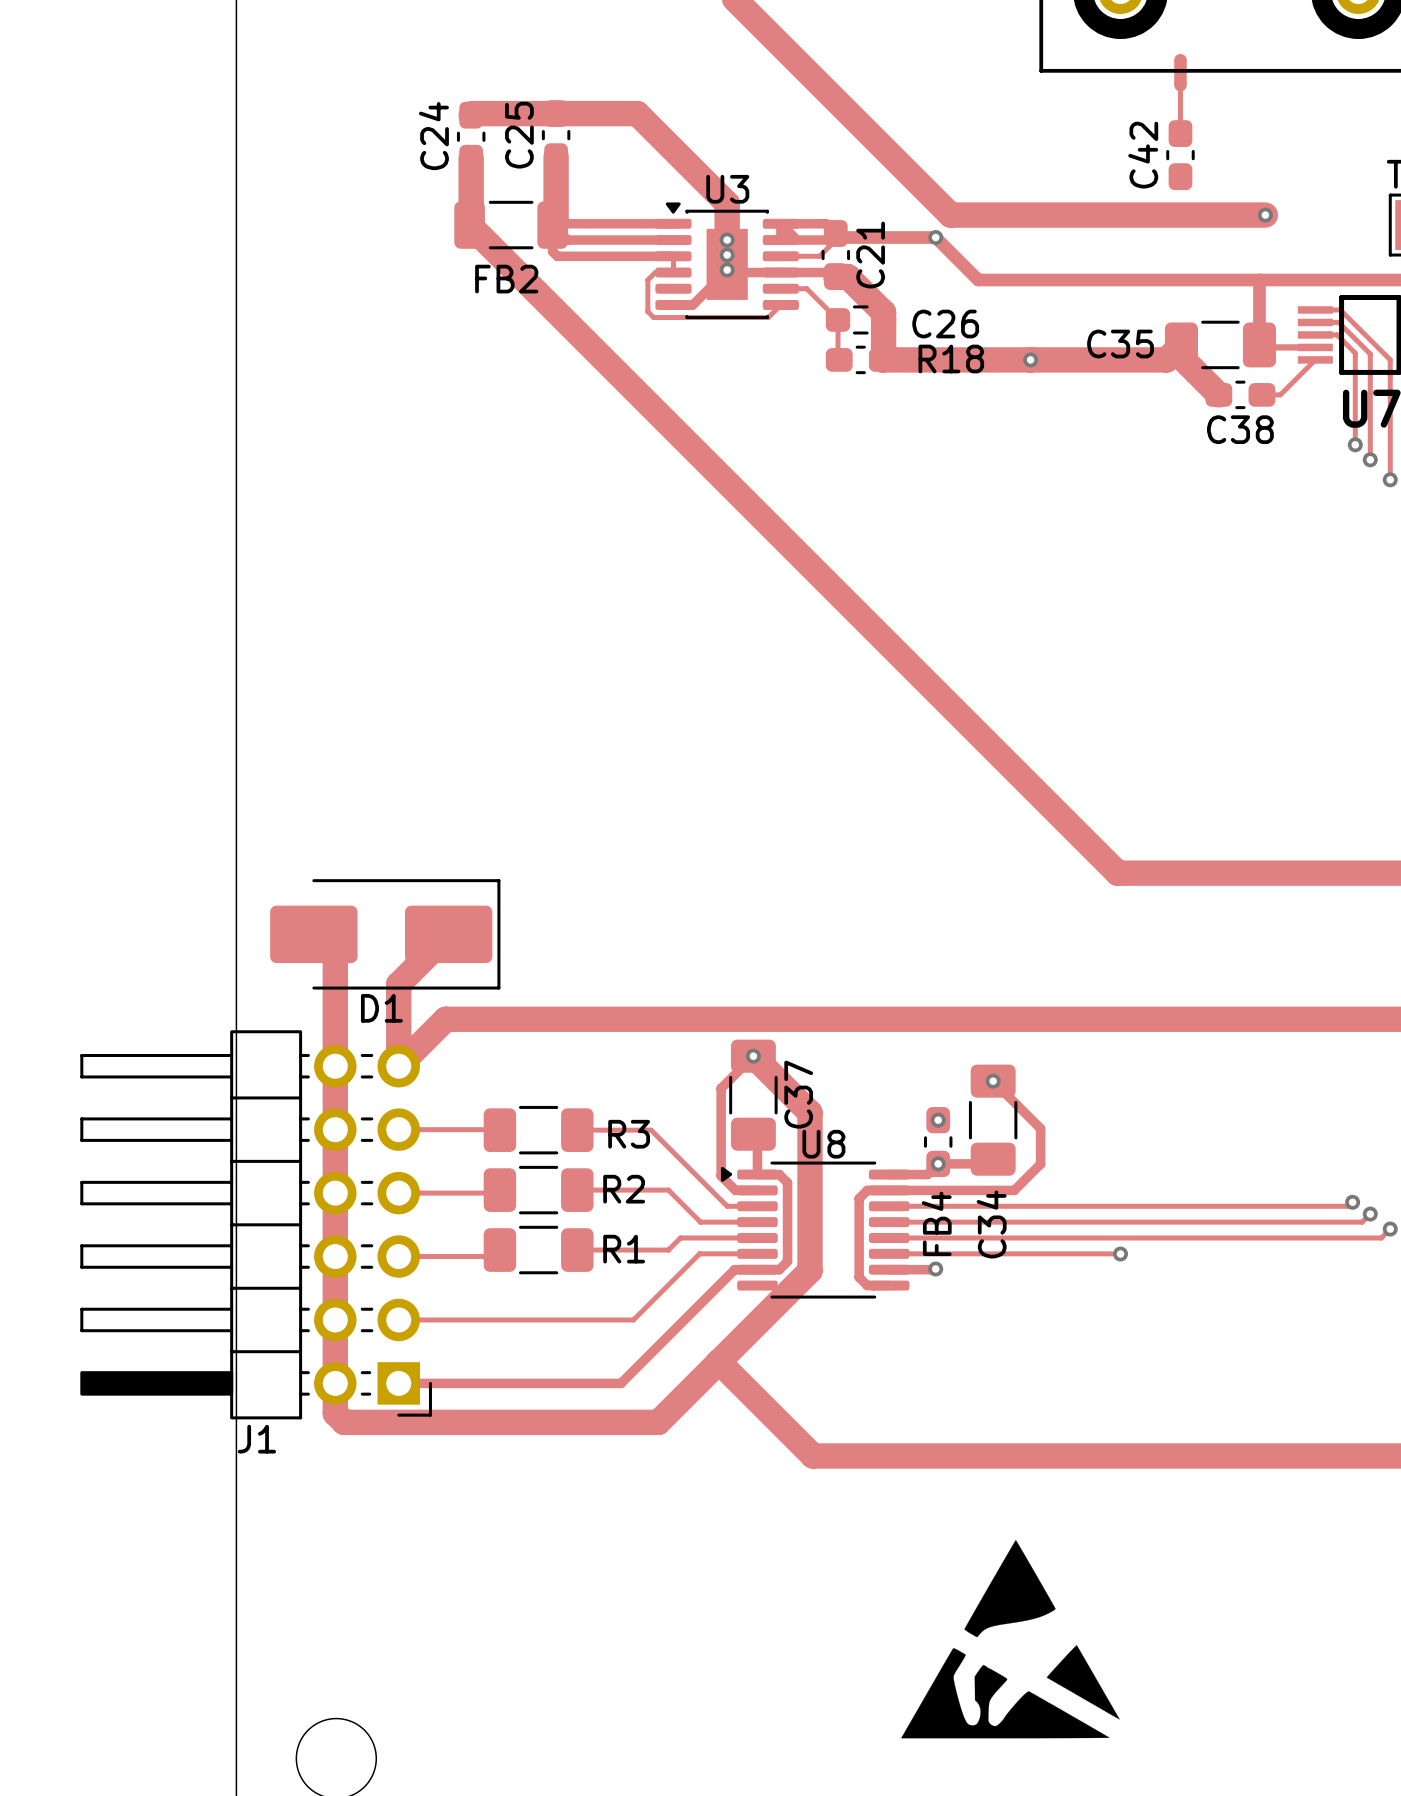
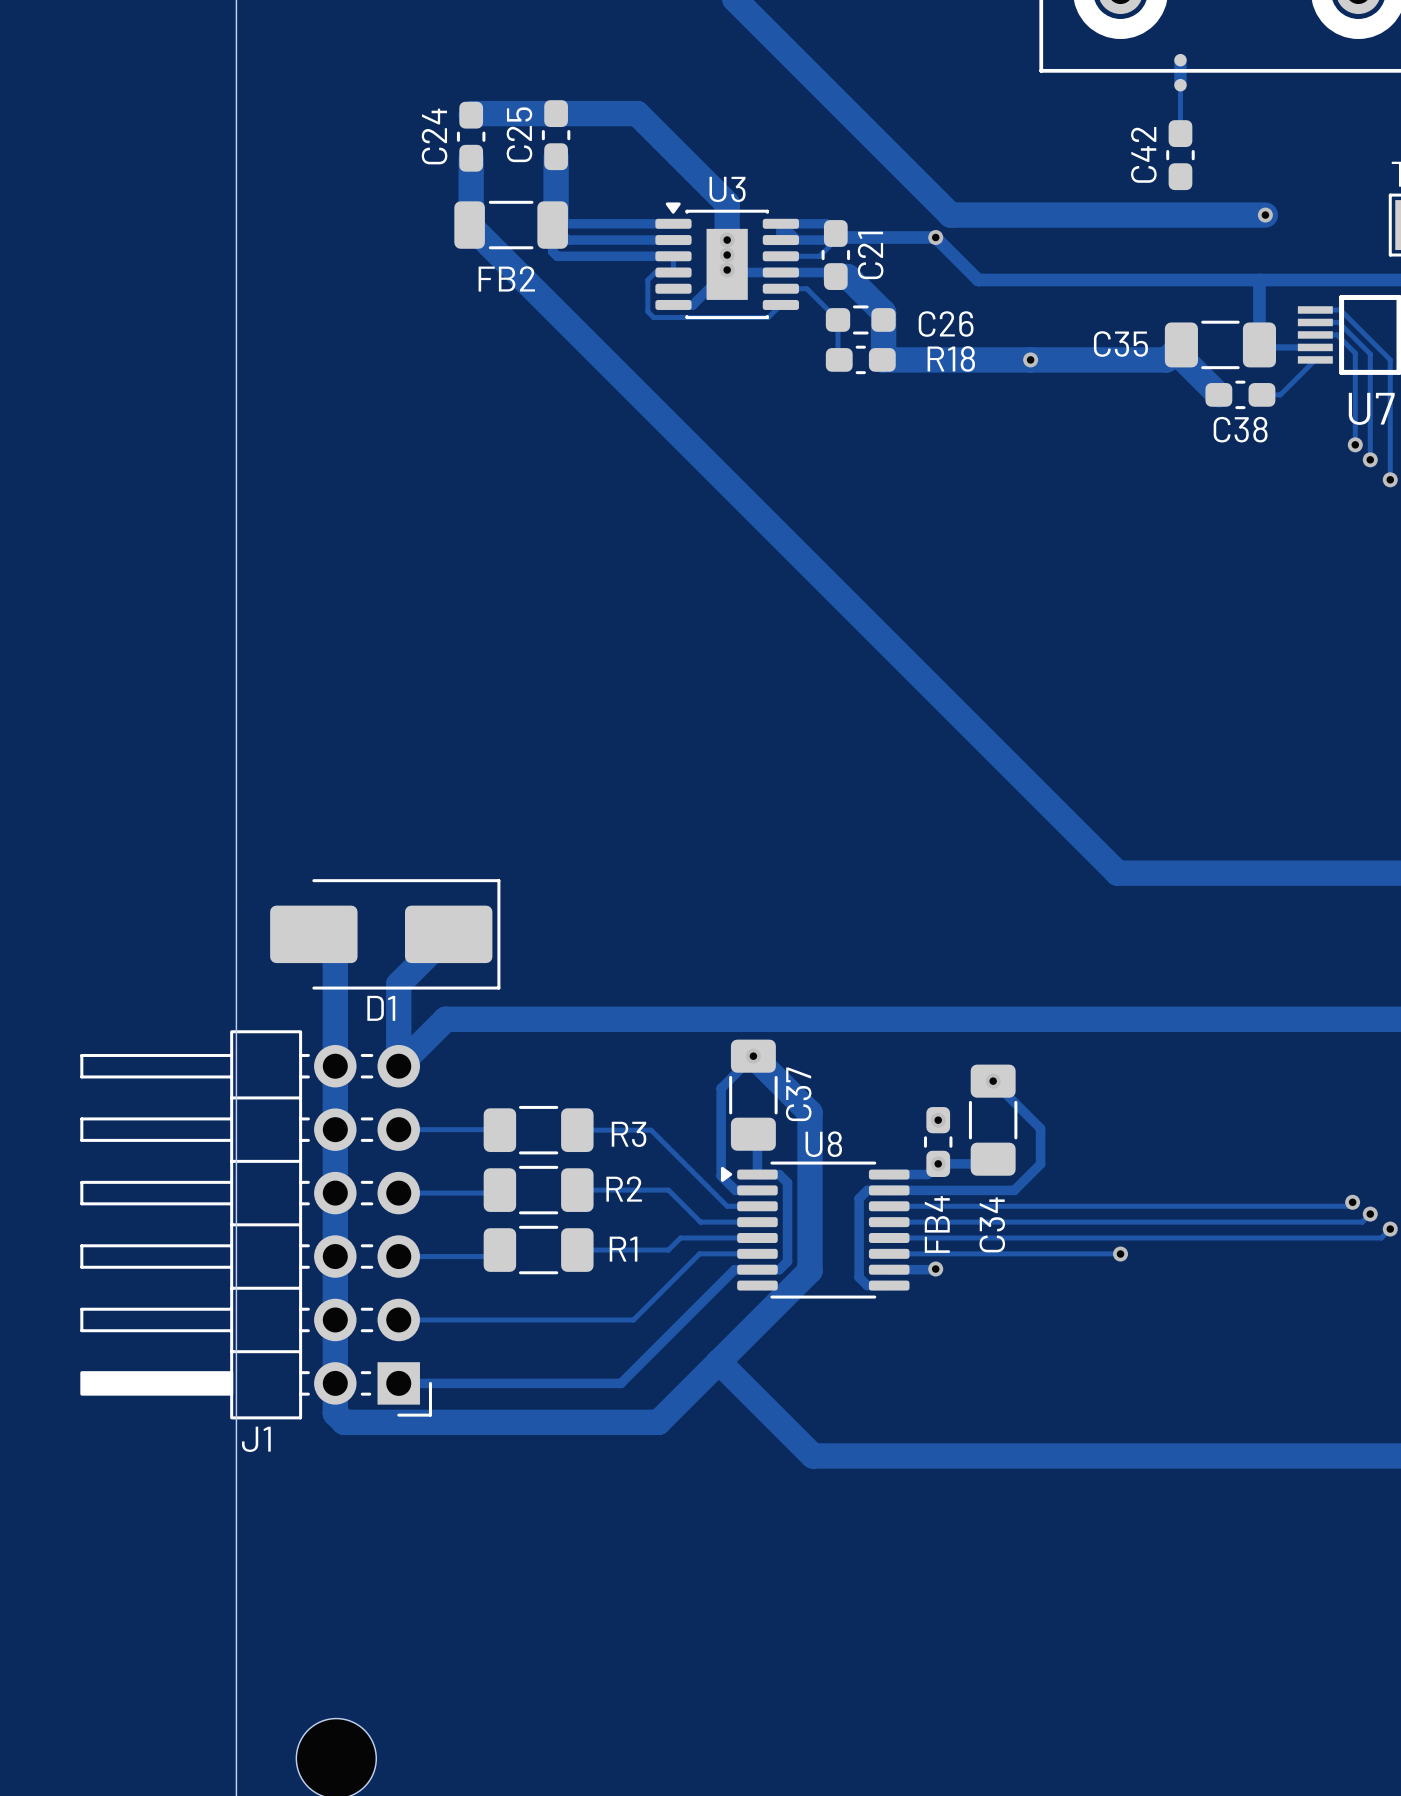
drawing: [901, 1540, 1120, 1739] -> none

